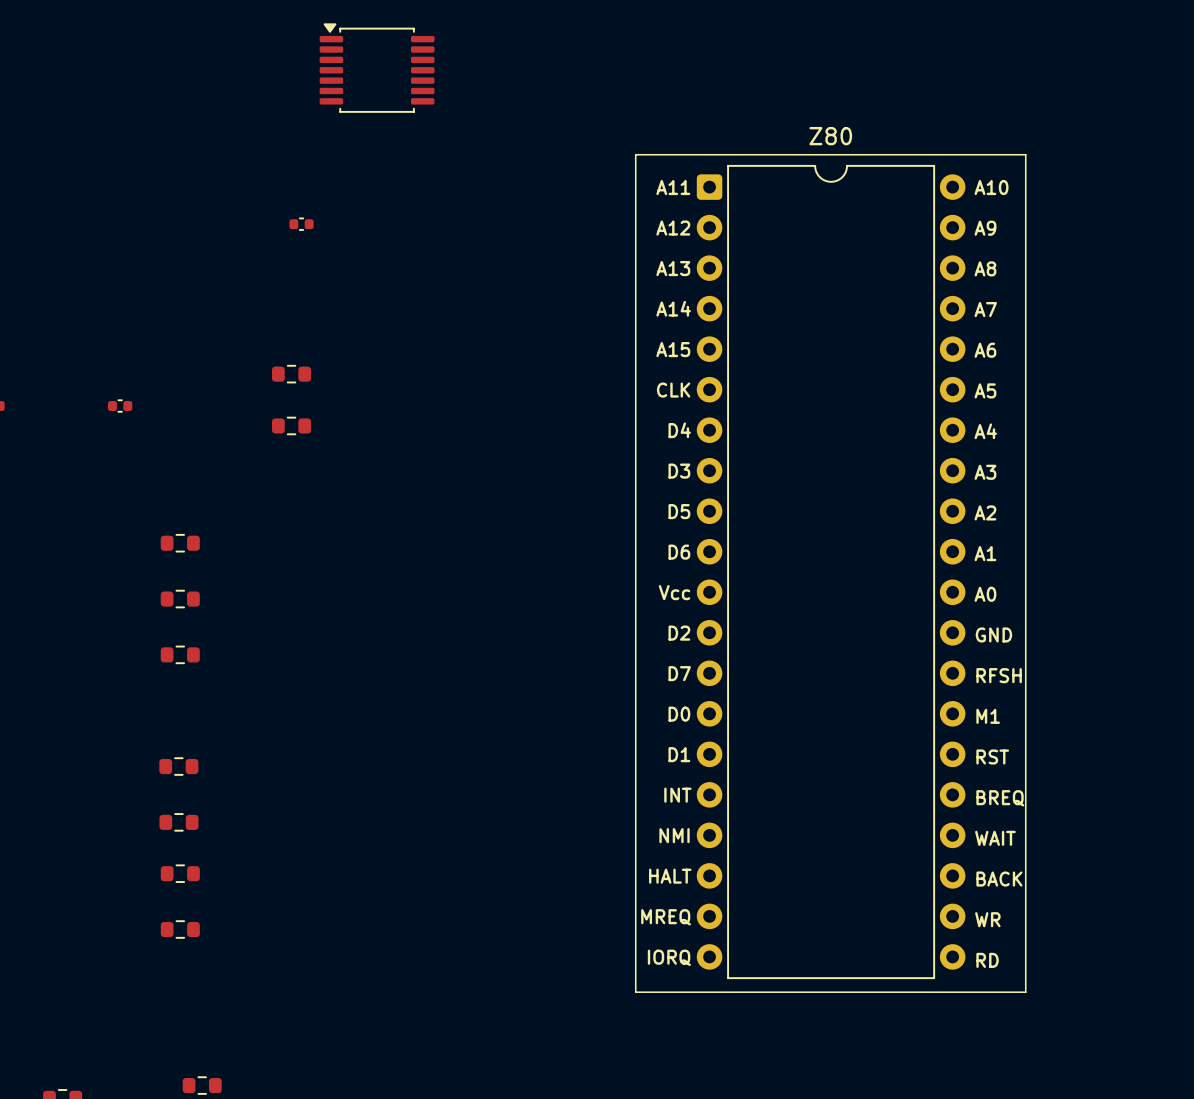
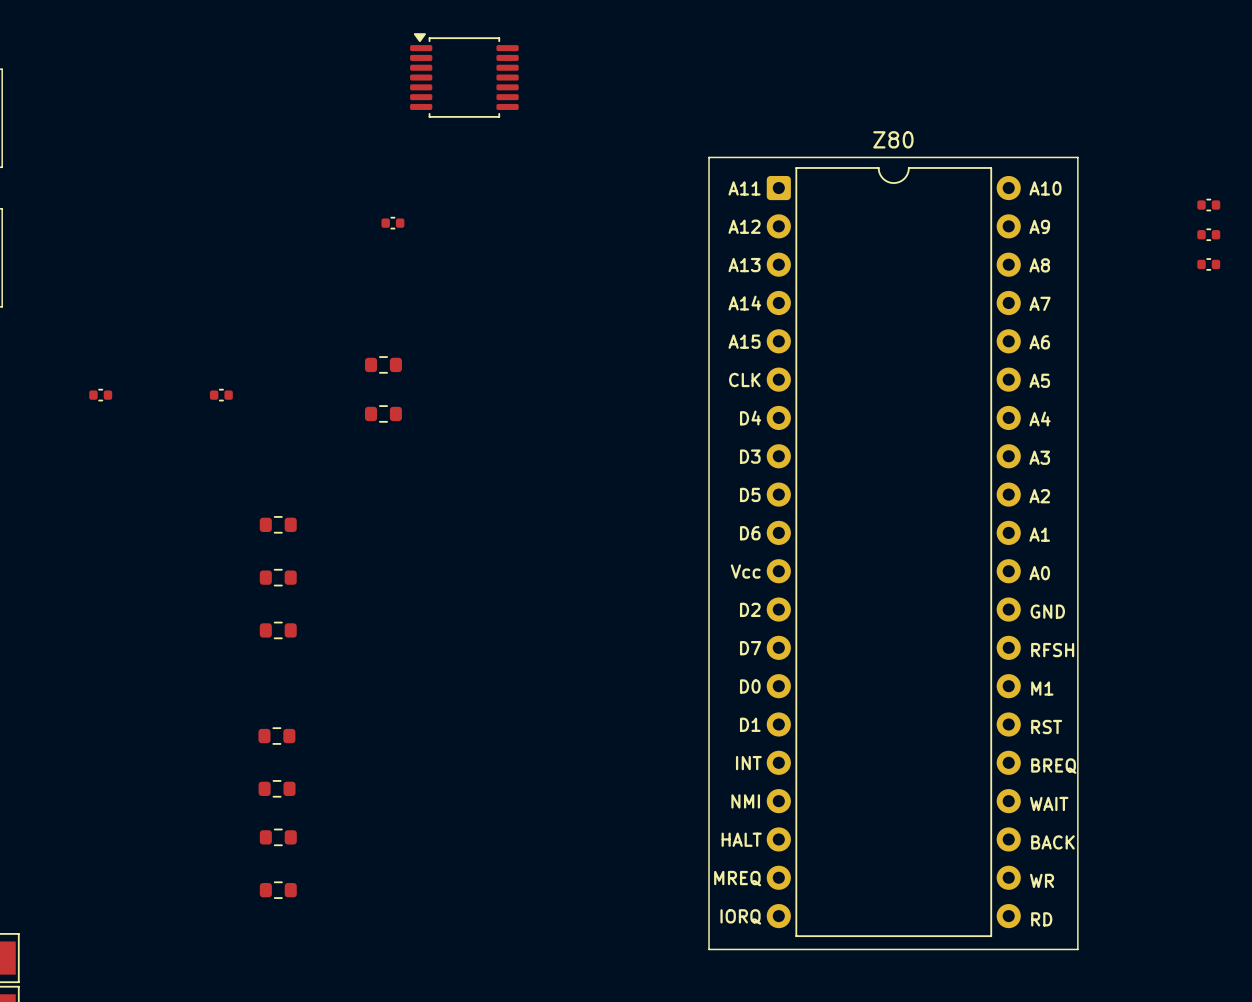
part: none -> (1208, 205)
part: none -> (1208, 234)
part: none -> (1208, 264)

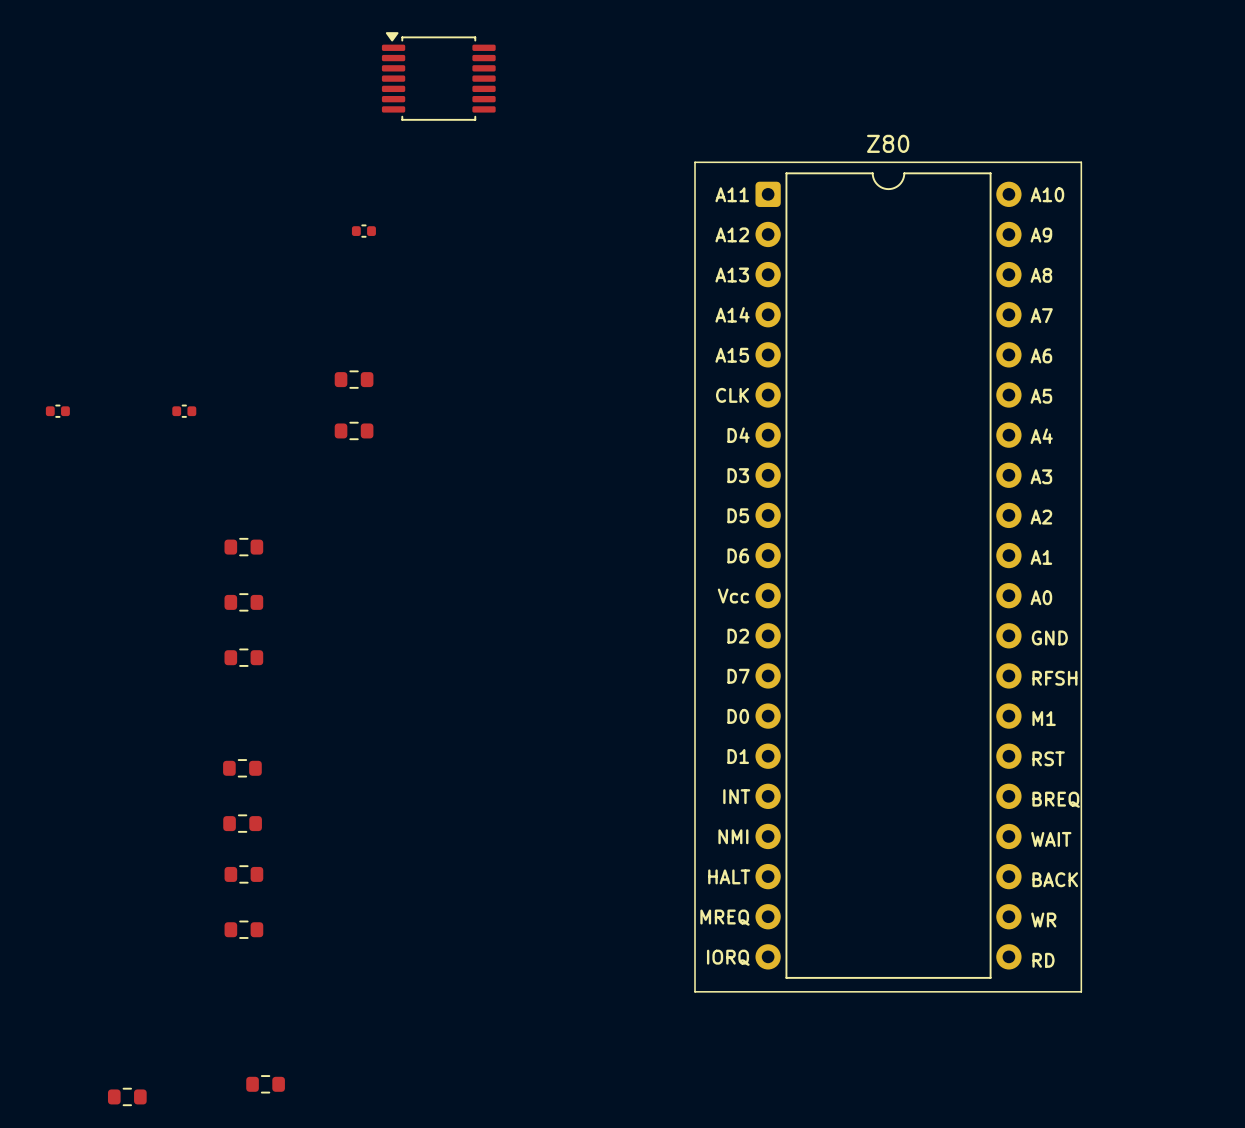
part: (1208, 205) -> none
part: (1208, 234) -> none
part: (1208, 264) -> none

